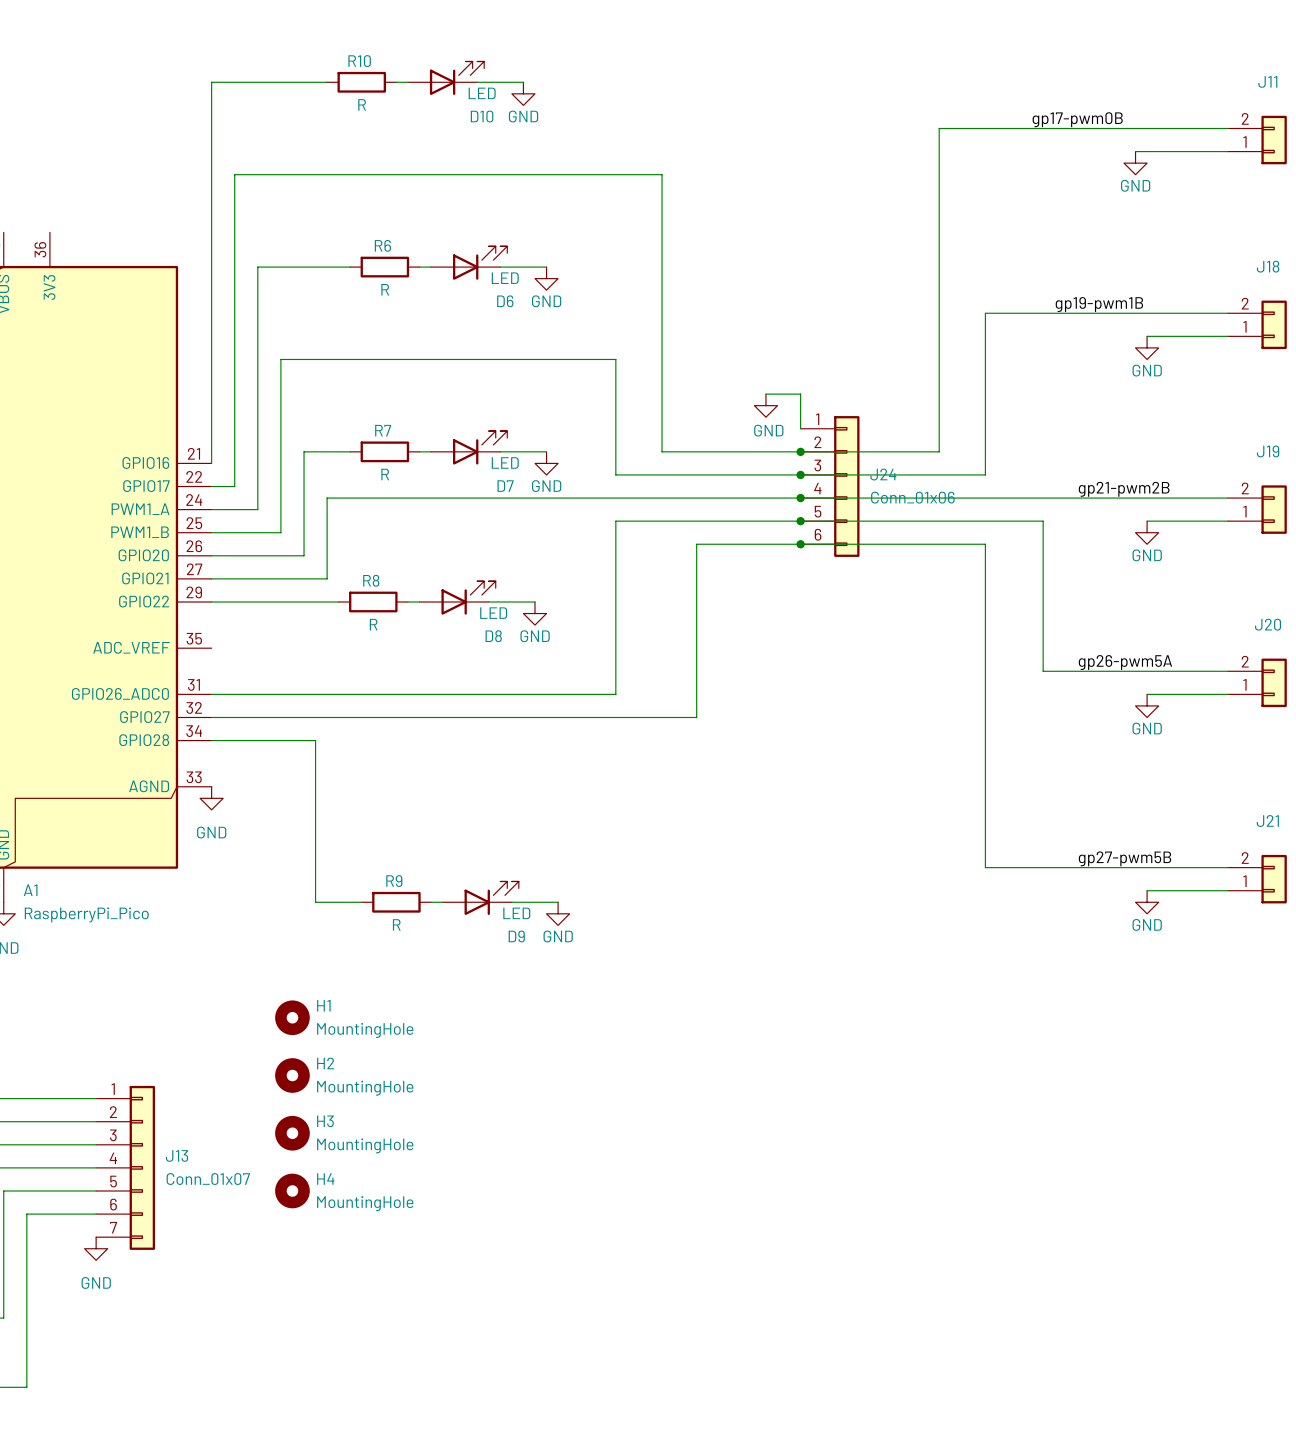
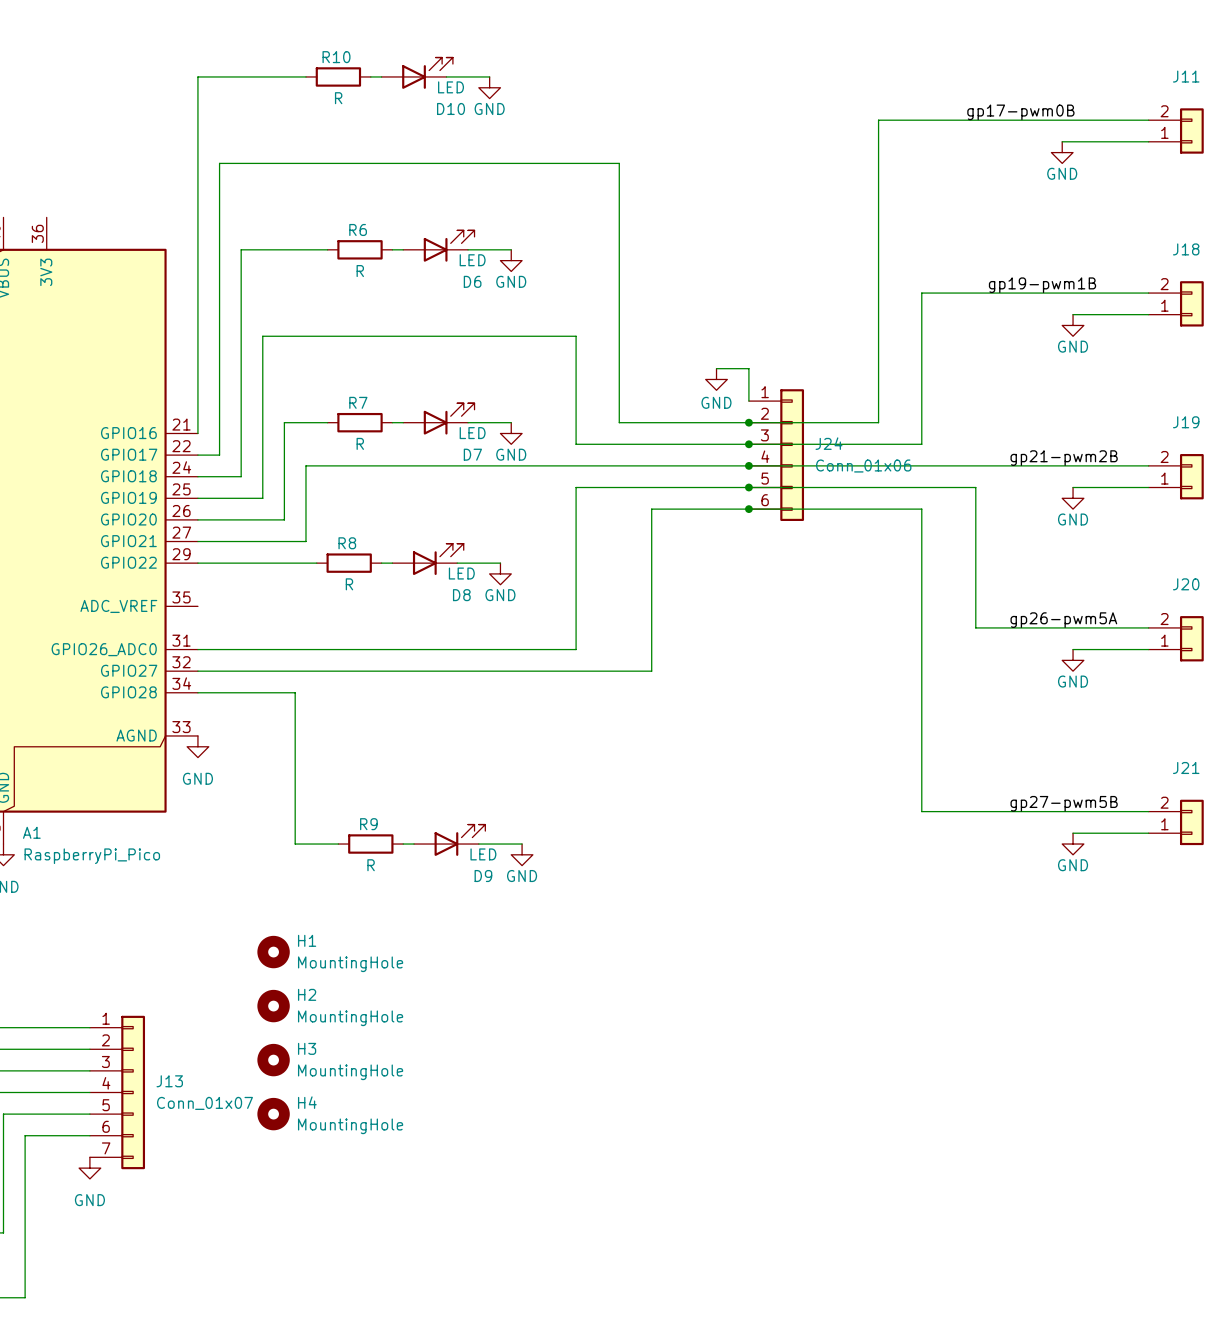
A1 pin name: PWM1_A (140, 509) -> GPIO18 (128, 476)
A1 pin name: PWM1_B (140, 532) -> GPIO19 (128, 497)

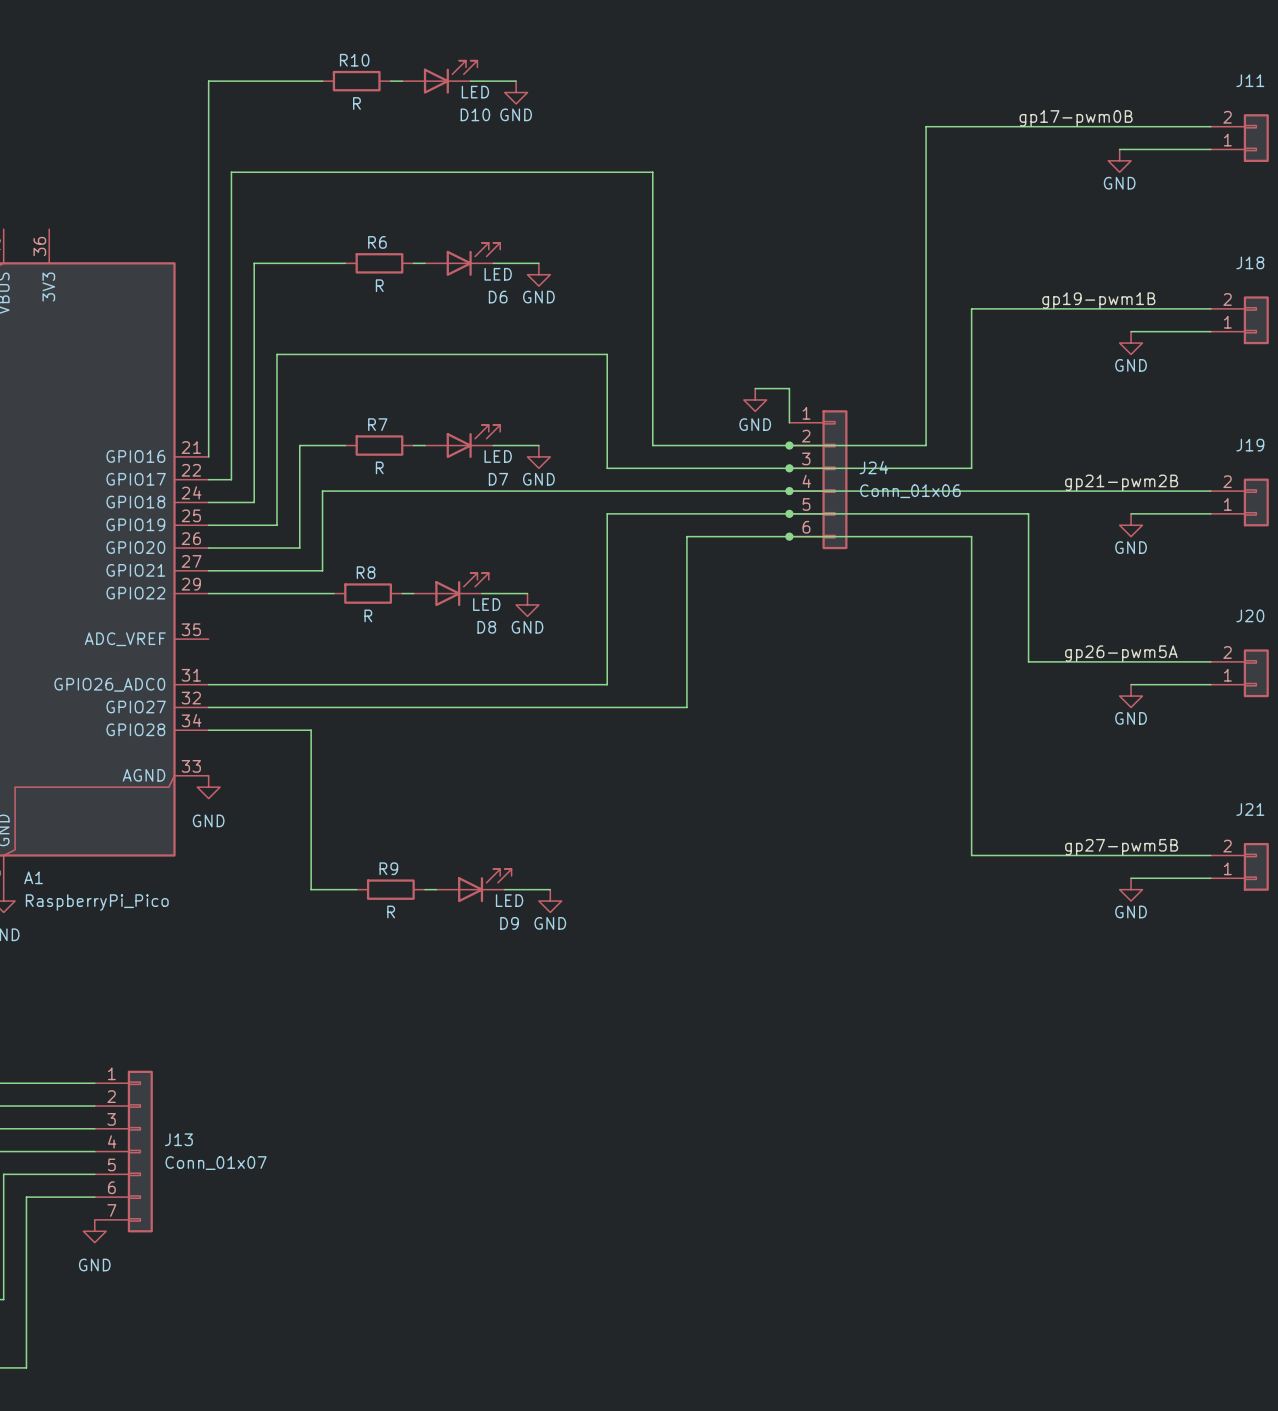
H1: MountingHole (273, 952) -> none
H2: MountingHole (273, 1006) -> none
H3: MountingHole (273, 1060) -> none
H4: MountingHole (273, 1114) -> none

